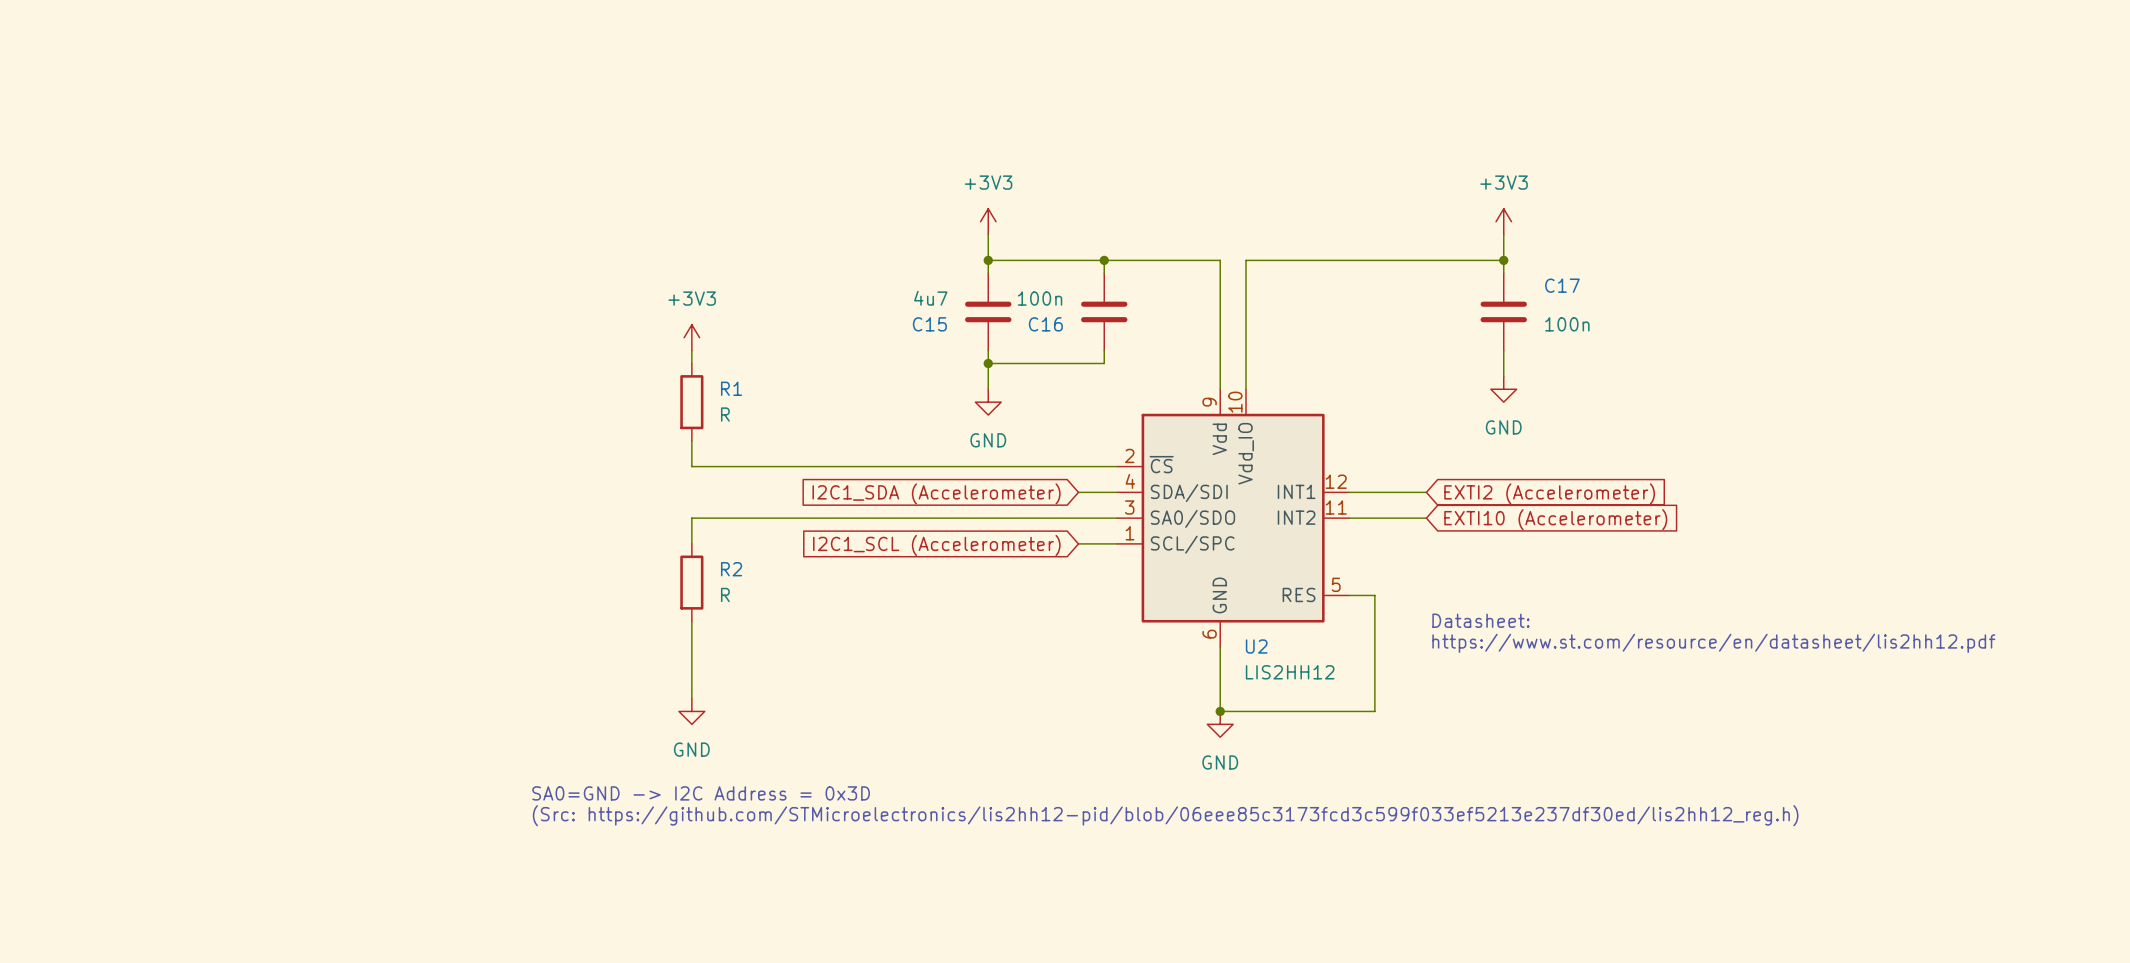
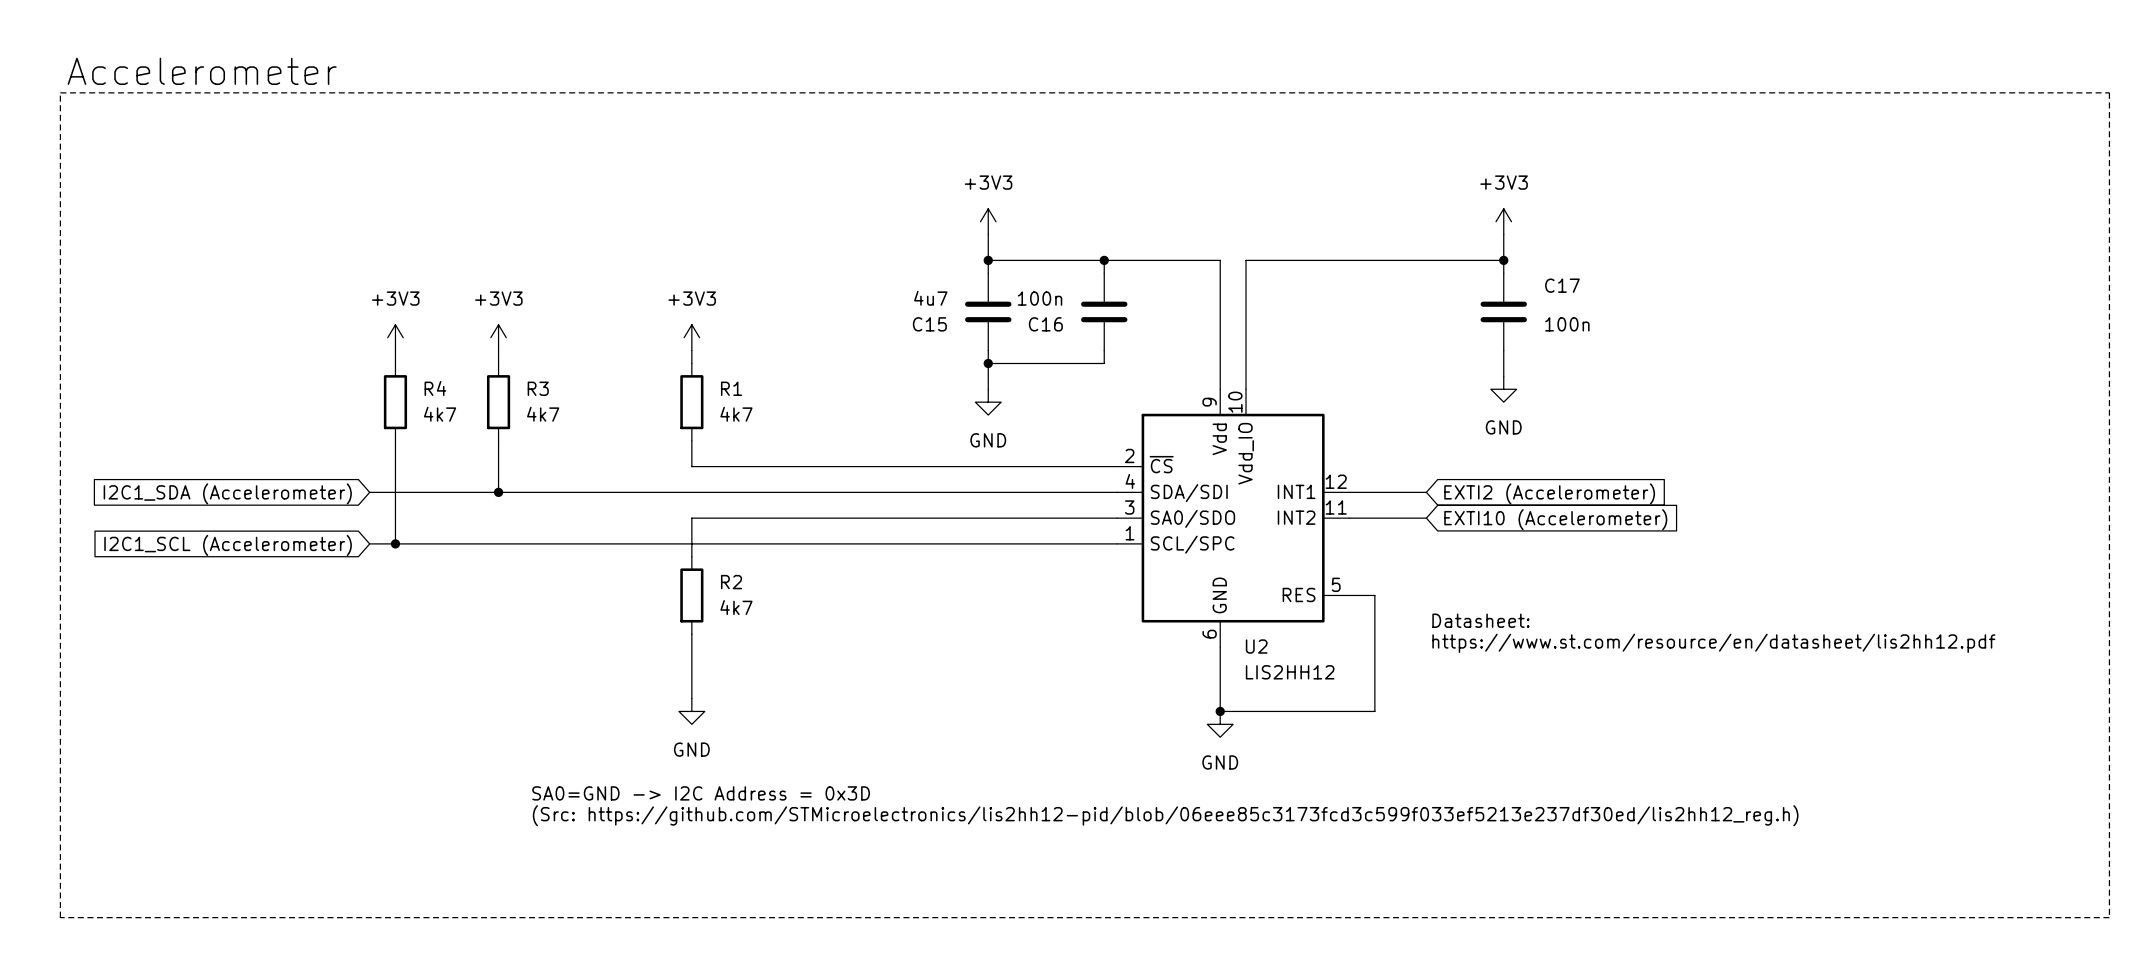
text: none -> Accelerometer (202, 71)
line: none -> (60, 92) (2109, 92) (2109, 917) (60, 917) (60, 92)
power symbol: none -> +3V3 (395, 337)
power symbol: none -> +3V3 (498, 337)
wire: none -> (395, 350) (395, 363)
wire: none -> (498, 350) (498, 363)
R4: none -> 4k7 (395, 402)
R3: none -> 4k7 (498, 402)
R1 value: R (725, 414) -> 4k7 (736, 414)
wire: none -> (395, 440) (395, 543)
wire: none -> (498, 440) (498, 492)
wire: none -> (369, 492) (1078, 492)
junction: none -> (498, 492)
global label: none -> I2C1_SDA (Accelerometer) (227, 493)
global label: I2C1_SDA (Accelerometer) (936, 493) -> none
wire: none -> (369, 543) (1078, 543)
junction: none -> (395, 543)
global label: none -> I2C1_SCL (Accelerometer) (228, 545)
global label: I2C1_SCL (Accelerometer) (936, 545) -> none
R2 position: (691, 582) -> (691, 595)
R2 value: R (725, 594) -> 4k7 (736, 607)

